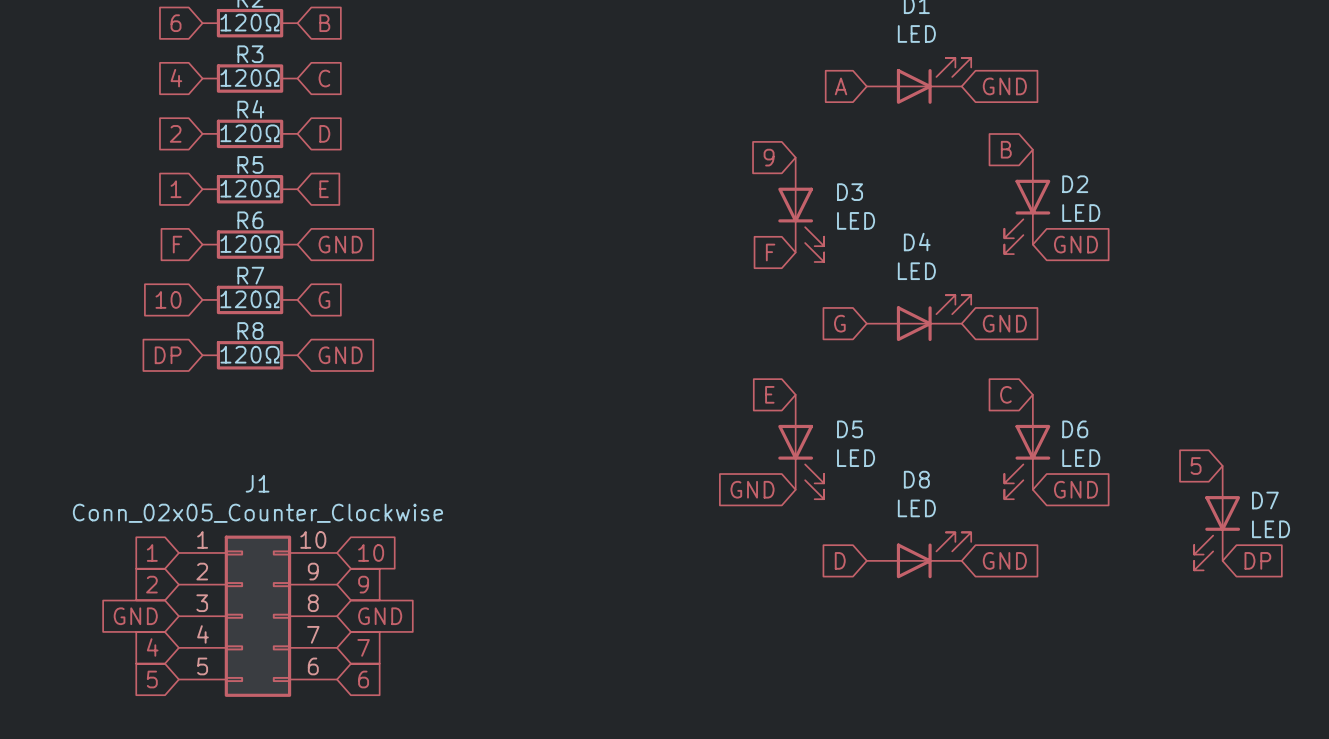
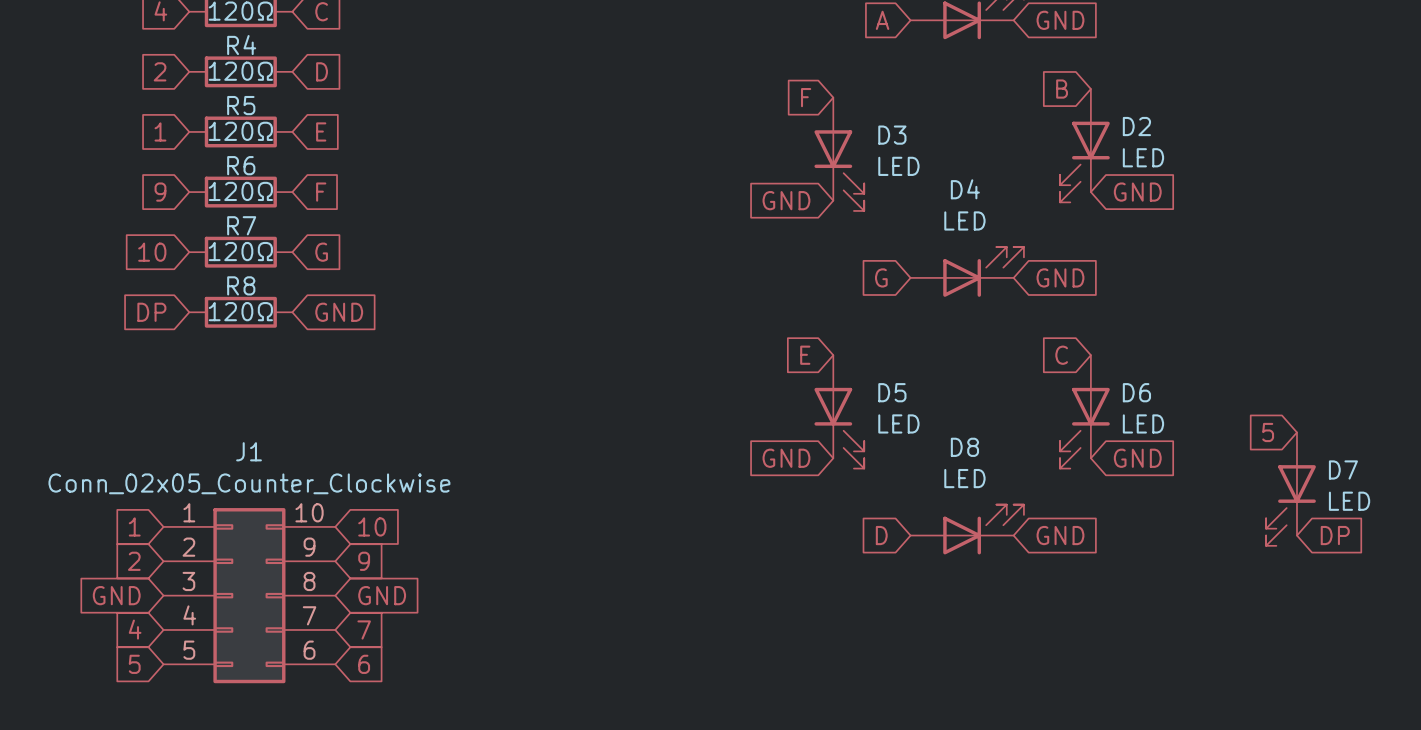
global label: 9 (769, 157) -> F (806, 97)
global label: F (177, 244) -> 9 (160, 192)
global label: GND (340, 244) -> F (321, 192)
global label: F (770, 252) -> GND (786, 200)

